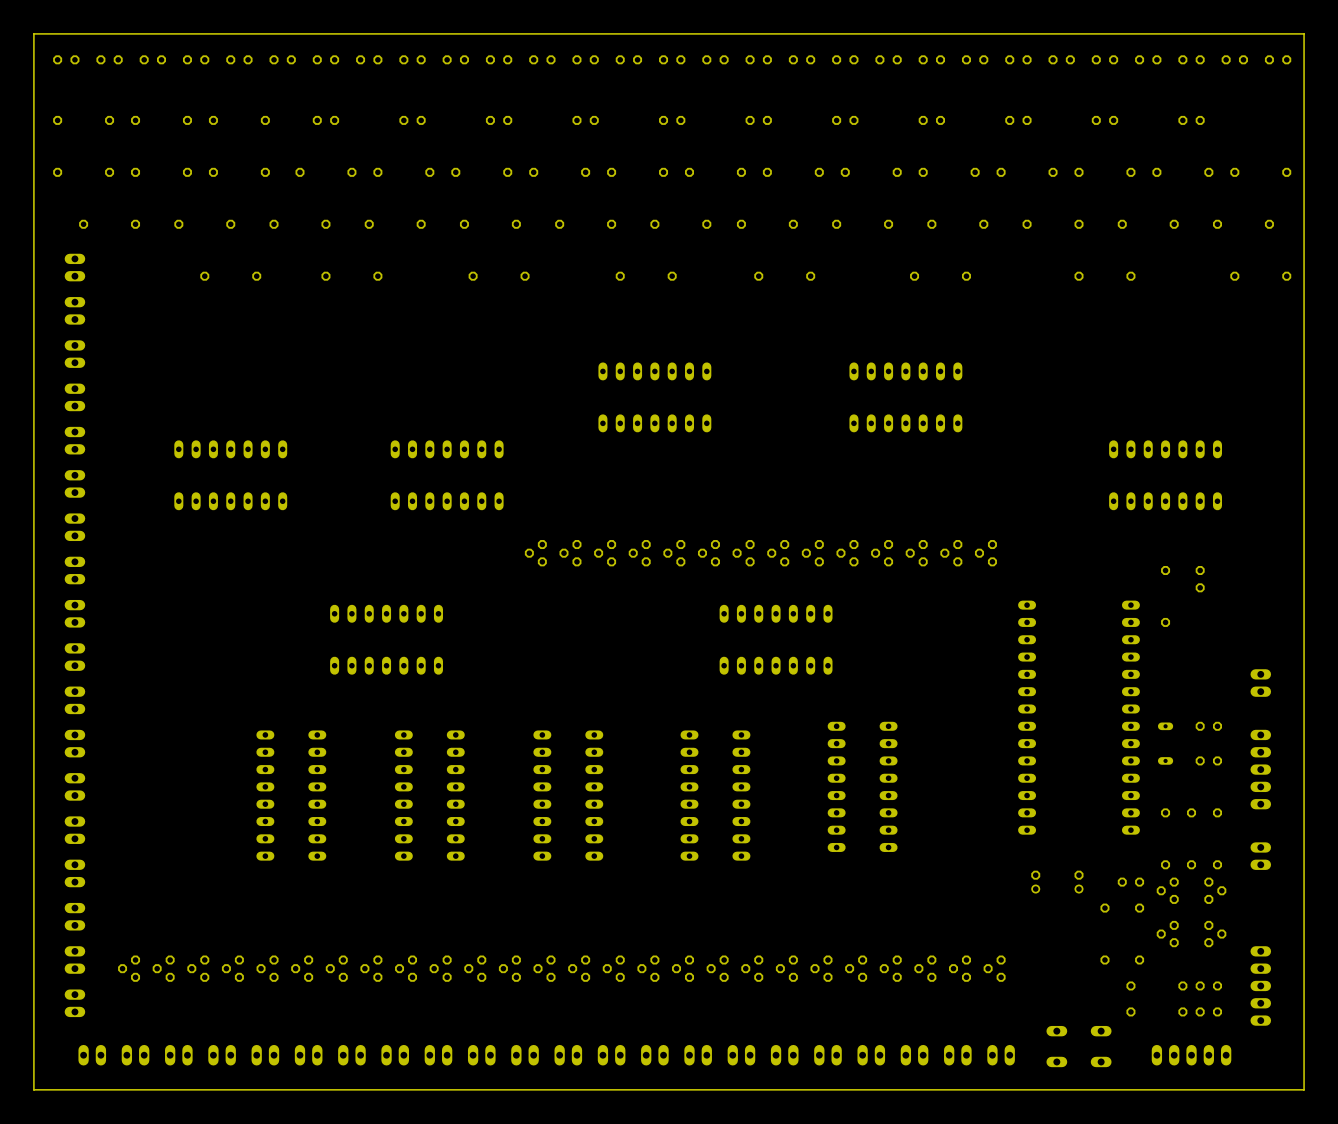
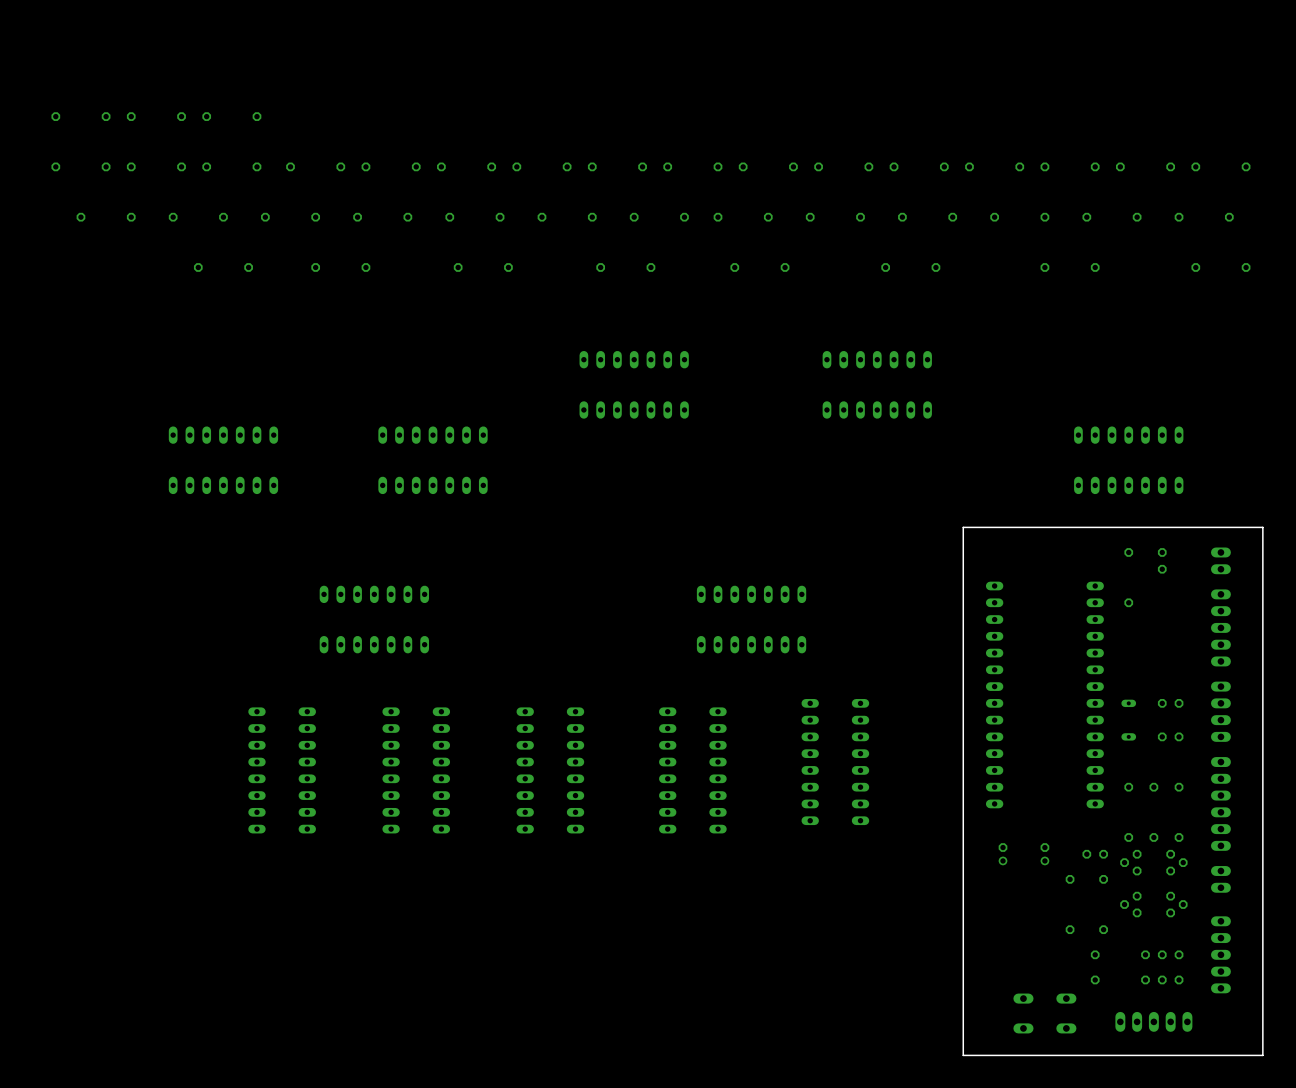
part: (66, 59) -> none
part: (109, 59) -> none
part: (152, 59) -> none
part: (196, 59) -> none
part: (239, 59) -> none
part: (282, 59) -> none
part: (325, 59) -> none
part: (369, 59) -> none
part: (412, 59) -> none
part: (455, 59) -> none
part: (499, 59) -> none
part: (542, 59) -> none
part: (585, 59) -> none
part: (628, 59) -> none
part: (672, 59) -> none
part: (715, 59) -> none
part: (758, 59) -> none
part: (802, 59) -> none
part: (845, 59) -> none
part: (888, 59) -> none
part: (931, 59) -> none
part: (975, 59) -> none
part: (1018, 59) -> none
part: (1061, 59) -> none
part: (1104, 59) -> none
part: (1148, 59) -> none
part: (1191, 59) -> none
part: (1234, 59) -> none
part: (1278, 59) -> none
part: (325, 120) -> none
part: (412, 120) -> none
part: (499, 120) -> none
part: (585, 120) -> none
part: (672, 120) -> none
part: (758, 120) -> none
part: (845, 120) -> none
part: (931, 120) -> none
part: (1018, 120) -> none
part: (1104, 120) -> none
part: (1191, 120) -> none
part: (74, 267) -> none
part: (74, 310) -> none
part: (74, 354) -> none
part: (74, 397) -> none
part: (74, 440) -> none
part: (74, 483) -> none
part: (74, 527) -> none
board edge: (1304, 544) (1304, 33) (33, 33) (33, 1089) (994, 1089) -> (1262, 527) (963, 527) (963, 1055)
part: (535, 553) -> none
part: (570, 553) -> none
part: (605, 553) -> none
part: (639, 553) -> none
part: (674, 553) -> none
part: (708, 553) -> none
part: (743, 553) -> none
part: (778, 553) -> none
part: (812, 553) -> none
part: (847, 553) -> none
part: (882, 553) -> none
part: (916, 553) -> none
part: (951, 553) -> none
part: (985, 553) -> none
part: (74, 570) -> none
part: (74, 613) -> none
part: (74, 657) -> none
part position: (1260, 683) -> (1220, 560)
part: (74, 700) -> none
part: none -> (1220, 711)
part: (74, 743) -> none
part position: (1260, 769) -> (1220, 627)
part: (74, 786) -> none
part: (74, 830) -> none
part: none -> (1220, 803)
part position: (1260, 856) -> (1220, 879)
part: (74, 873) -> none
part: (74, 916) -> none
part: (74, 960) -> none
part: (129, 968) -> none
part: (163, 968) -> none
part: (198, 968) -> none
part: (232, 968) -> none
part: (267, 968) -> none
part: (302, 968) -> none
part: (336, 968) -> none
part: (371, 968) -> none
part: (406, 968) -> none
part: (440, 968) -> none
part: (475, 968) -> none
part: (509, 968) -> none
part: (544, 968) -> none
part: (579, 968) -> none
part: (613, 968) -> none
part: (648, 968) -> none
part: (683, 968) -> none
part: (717, 968) -> none
part: (752, 968) -> none
part: (786, 968) -> none
part: (821, 968) -> none
part: (856, 968) -> none
part: (890, 968) -> none
part: (925, 968) -> none
part: (959, 968) -> none
part: (994, 968) -> none
part: (74, 1003) -> none
part: (92, 1055) -> none
part: (135, 1055) -> none
part: (178, 1055) -> none
part: (222, 1055) -> none
part: (265, 1055) -> none
part: (308, 1055) -> none
part: (351, 1055) -> none
part: (395, 1055) -> none
part: (438, 1055) -> none
part: (481, 1055) -> none
part: (525, 1055) -> none
part: (568, 1055) -> none
part: (611, 1055) -> none
part: (654, 1055) -> none
part: (698, 1055) -> none
part: (741, 1055) -> none
part: (784, 1055) -> none
part: (827, 1055) -> none
part: (871, 1055) -> none
part: (914, 1055) -> none
part: (957, 1055) -> none
part: (1001, 1055) -> none

